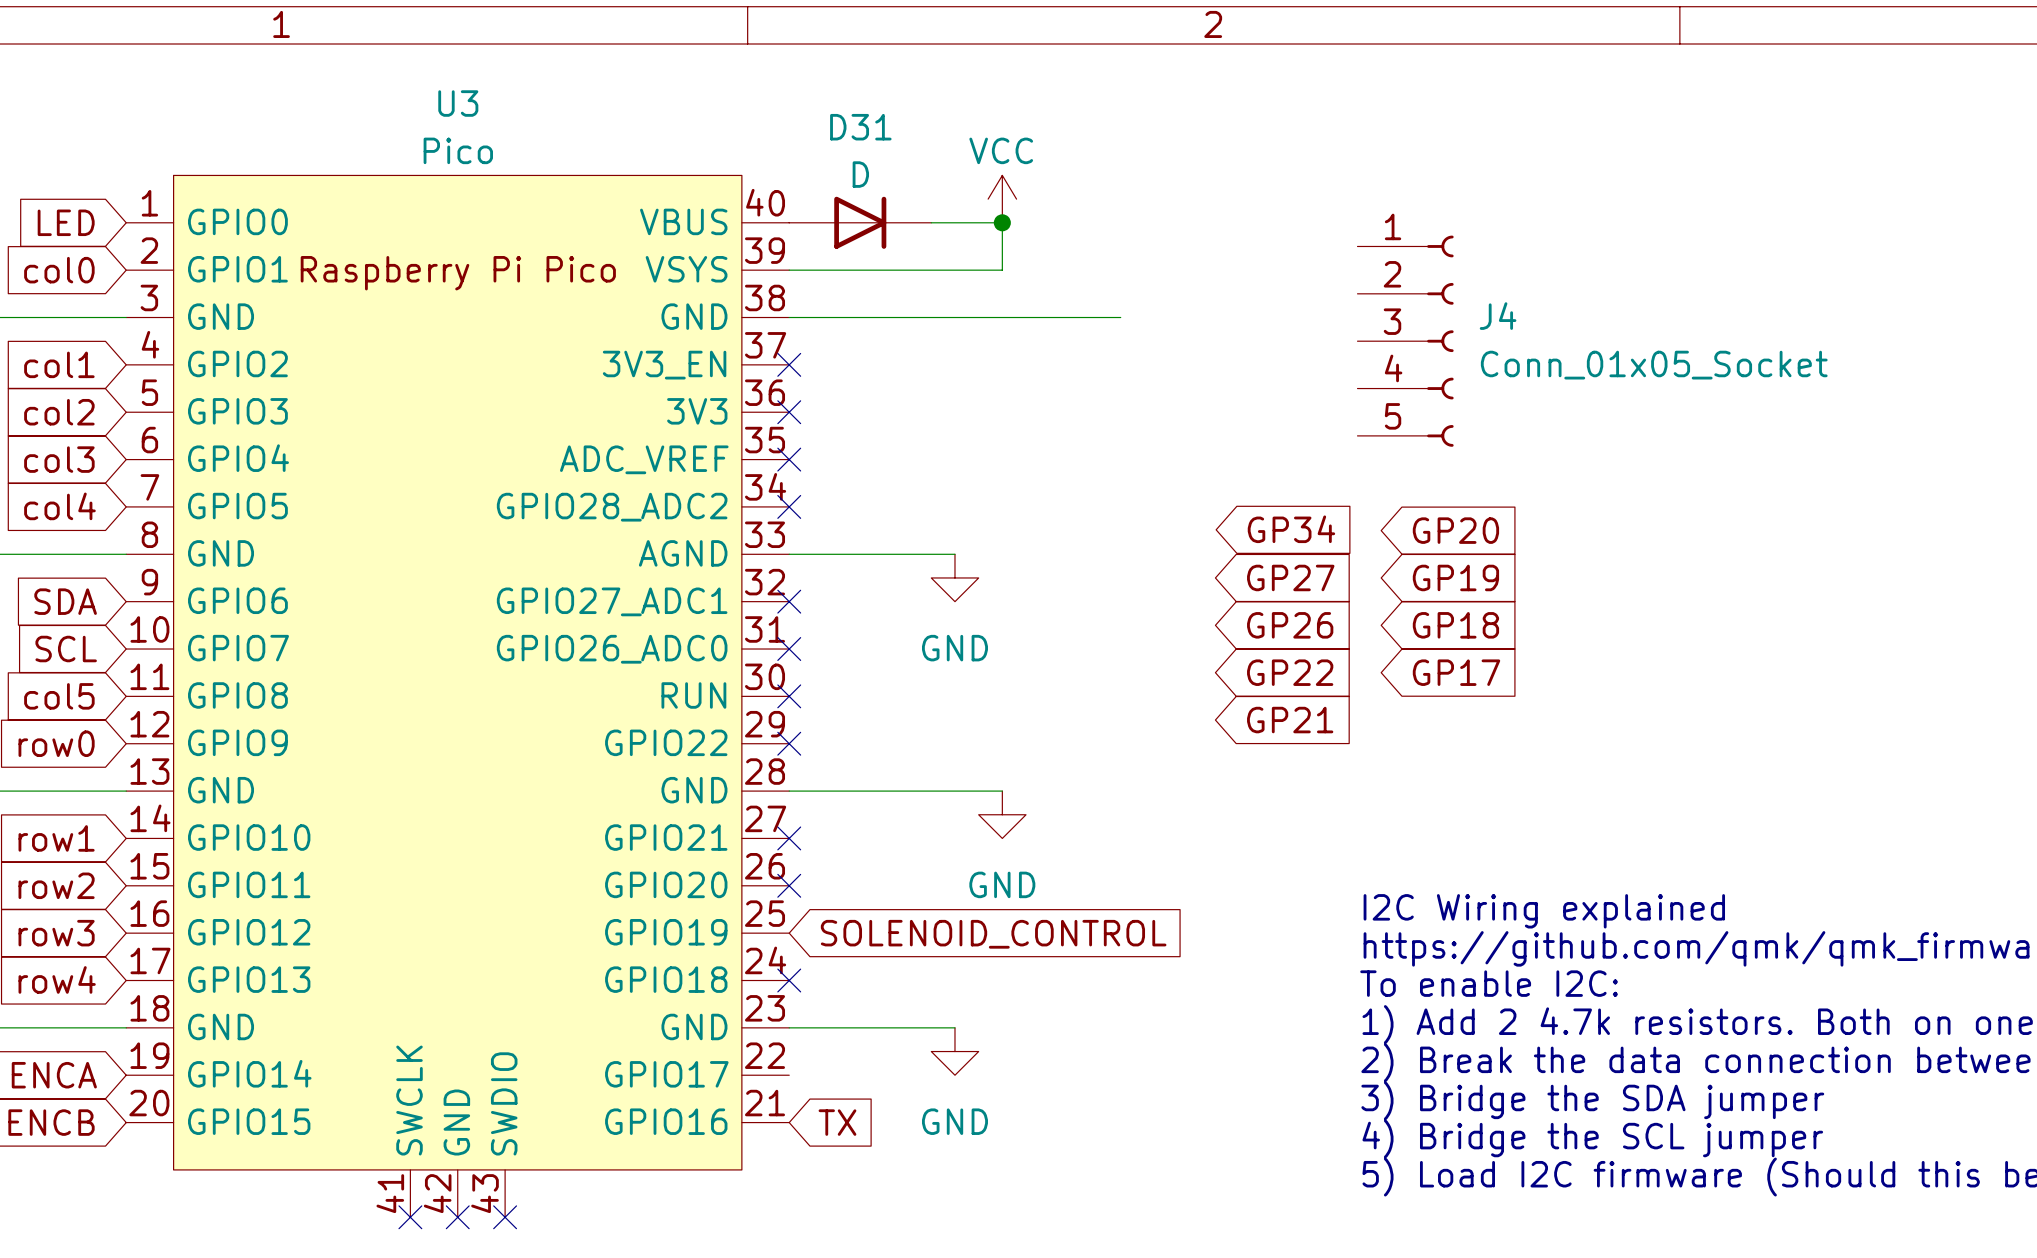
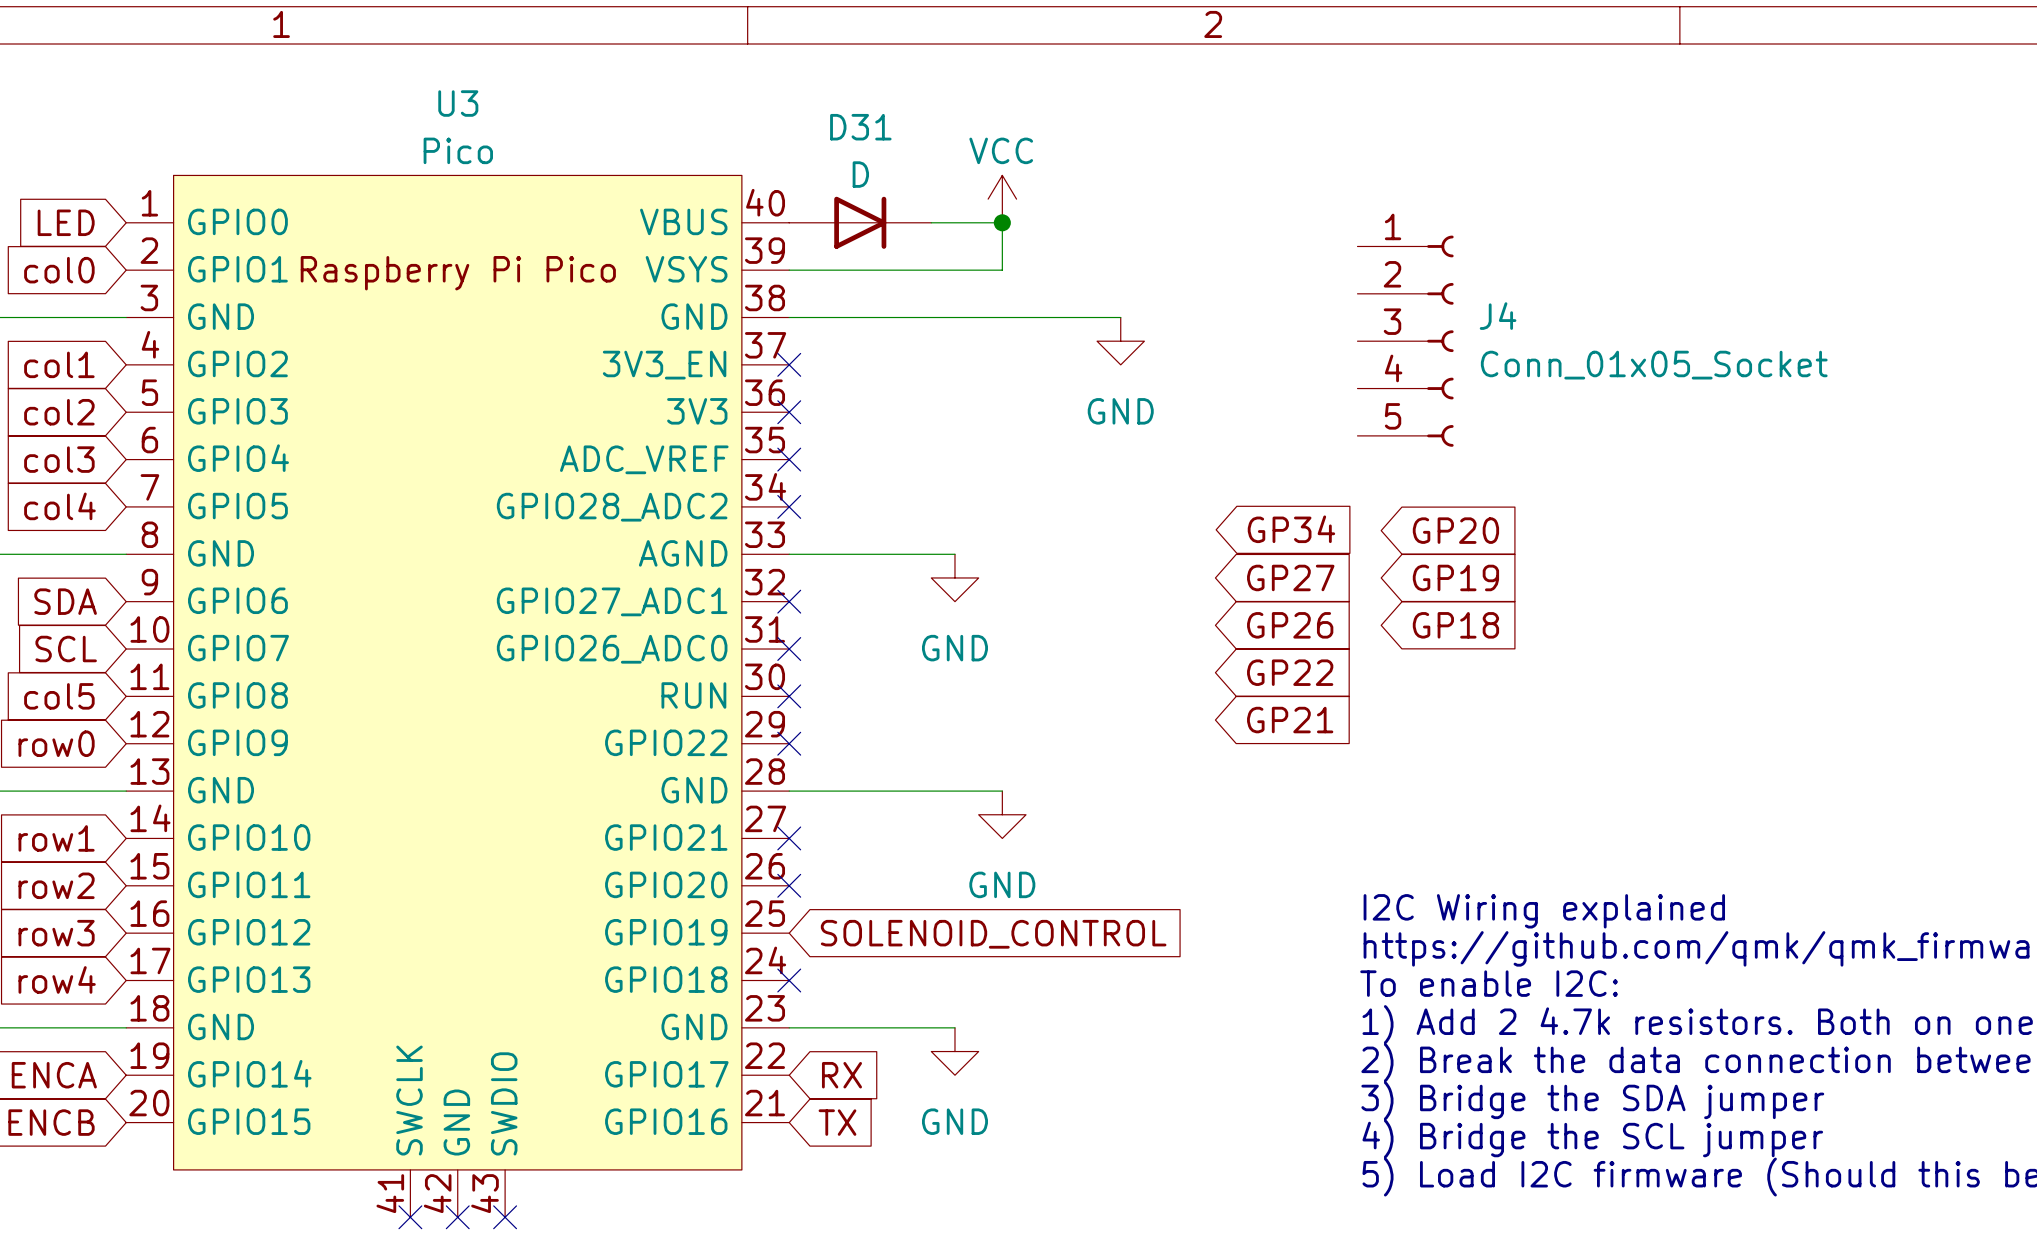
power symbol: none -> GND (1120, 341)
global label: GP17 (1456, 672) -> none
global label: none -> RX (841, 1075)

